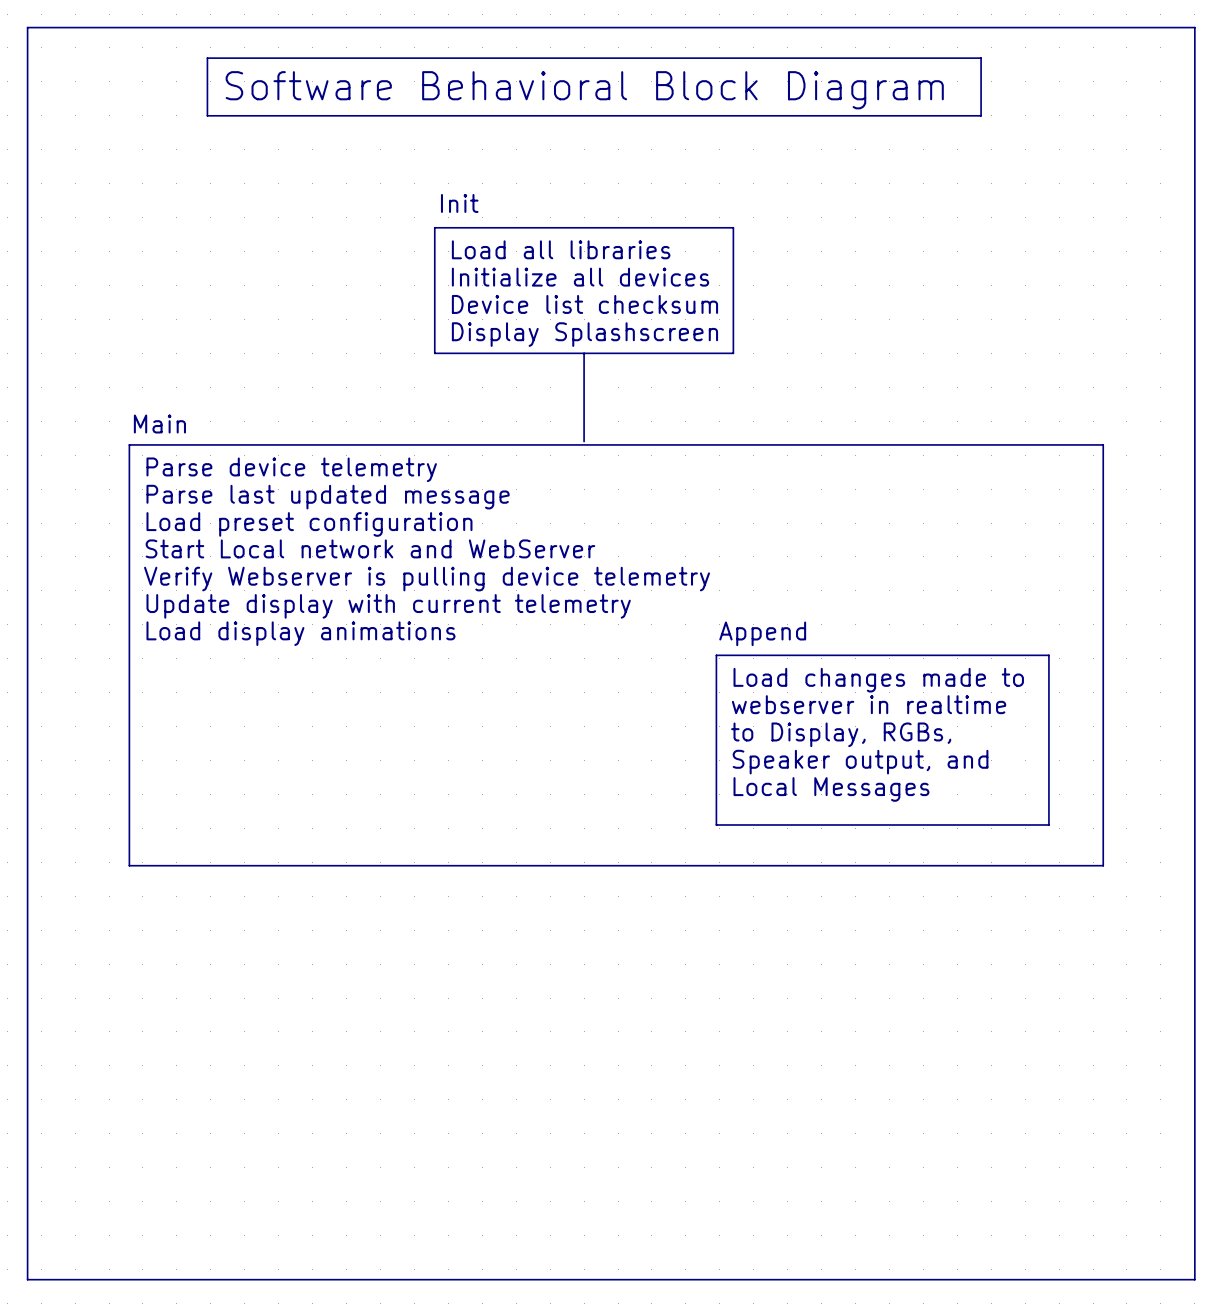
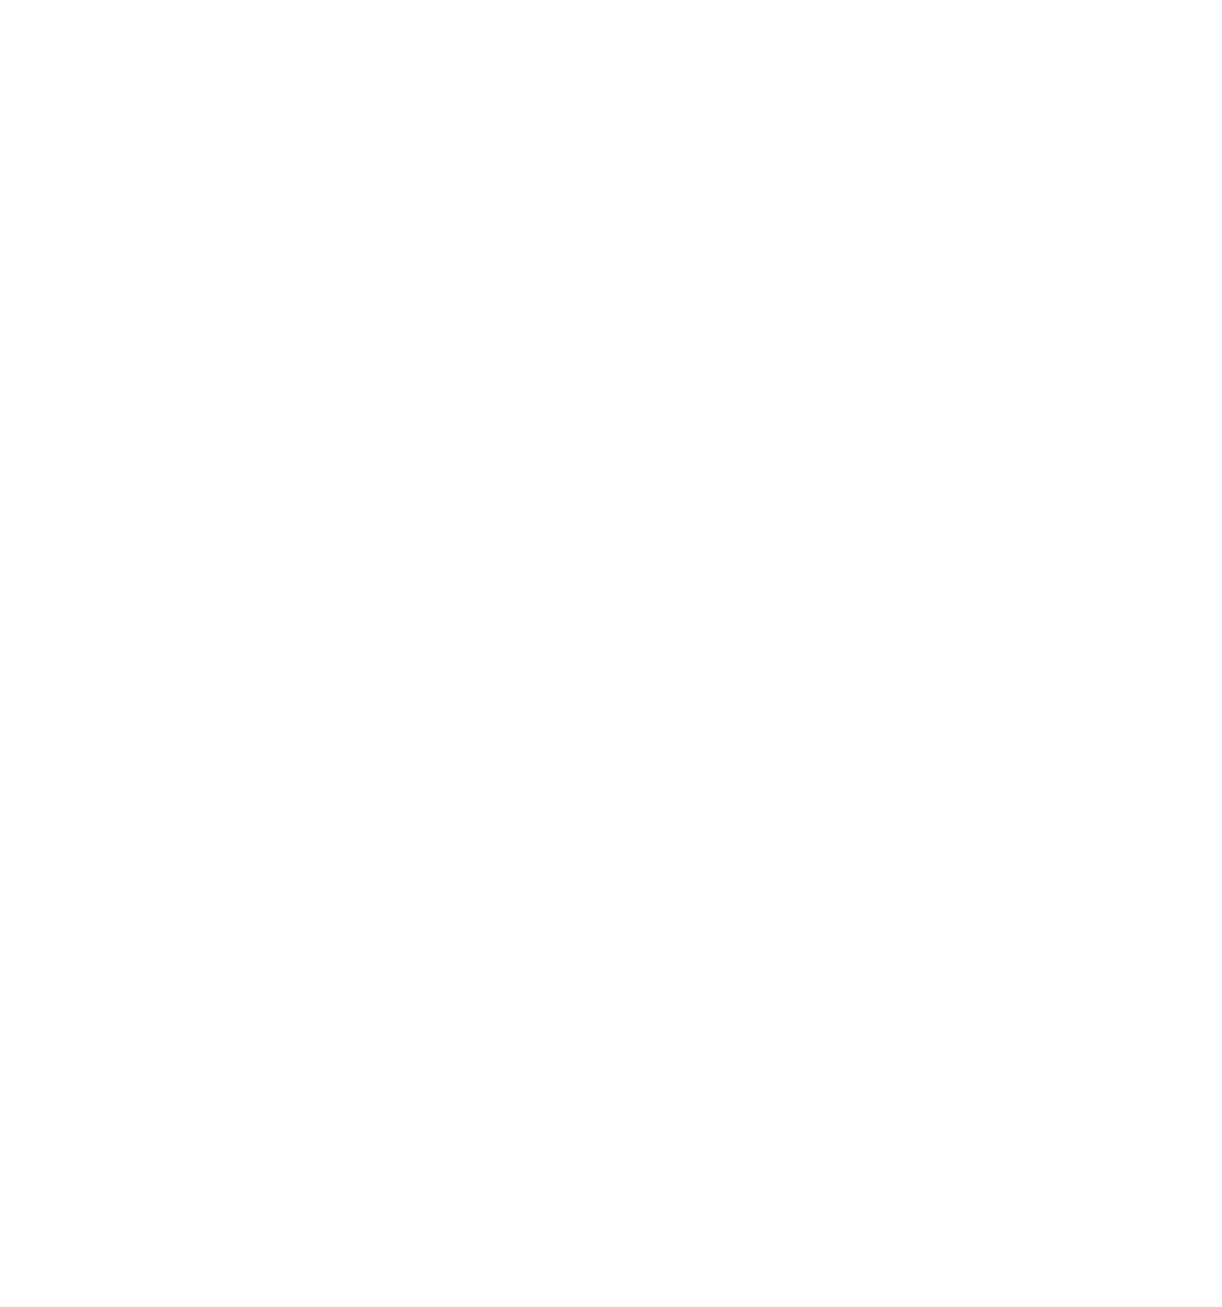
line: (27, 27) (1194, 27) (1194, 1279) (27, 1279) (27, 27) -> none
line: (207, 58) (981, 58) (981, 115) (207, 115) (207, 58) -> none
text: Software Behavioral Block Diagram (584, 90) -> none
text: Init (459, 203) -> none
line: (434, 227) (733, 227) (733, 353) (434, 353) (434, 227) -> none
text: Load all libraries (561, 249) -> none
text: Initialize all devices (580, 277) -> none
text: Device list checksum (584, 304) -> none
text: Display Splashscreen (584, 334) -> none
line: (584, 353) (584, 441) -> none
text: Main (159, 424) -> none
line: (129, 444) (1103, 444) (1103, 865) (129, 865) (129, 444) -> none
text: Parse device telemetry (291, 469) -> none
text: Parse last updated message (328, 497) -> none
text: Load preset configuration (309, 524) -> none
text: Start Local network and WebServer (370, 548) -> none
text: Verify Webserver is pulling device telemetry (427, 579) -> none
text: Update display with current telemetry (388, 606) -> none
text: Load display animations (300, 633) -> none
text: Append (762, 633) -> none
line: (716, 655) (1048, 655) (1048, 824) (716, 824) (716, 655) -> none
text: Load changes made to (878, 680) -> none
text: webserver in realtime (869, 704) -> none
text: to Display, RGBs, (841, 734) -> none
text: Speaker output, and (860, 762) -> none
text: Local Messages (831, 789) -> none

